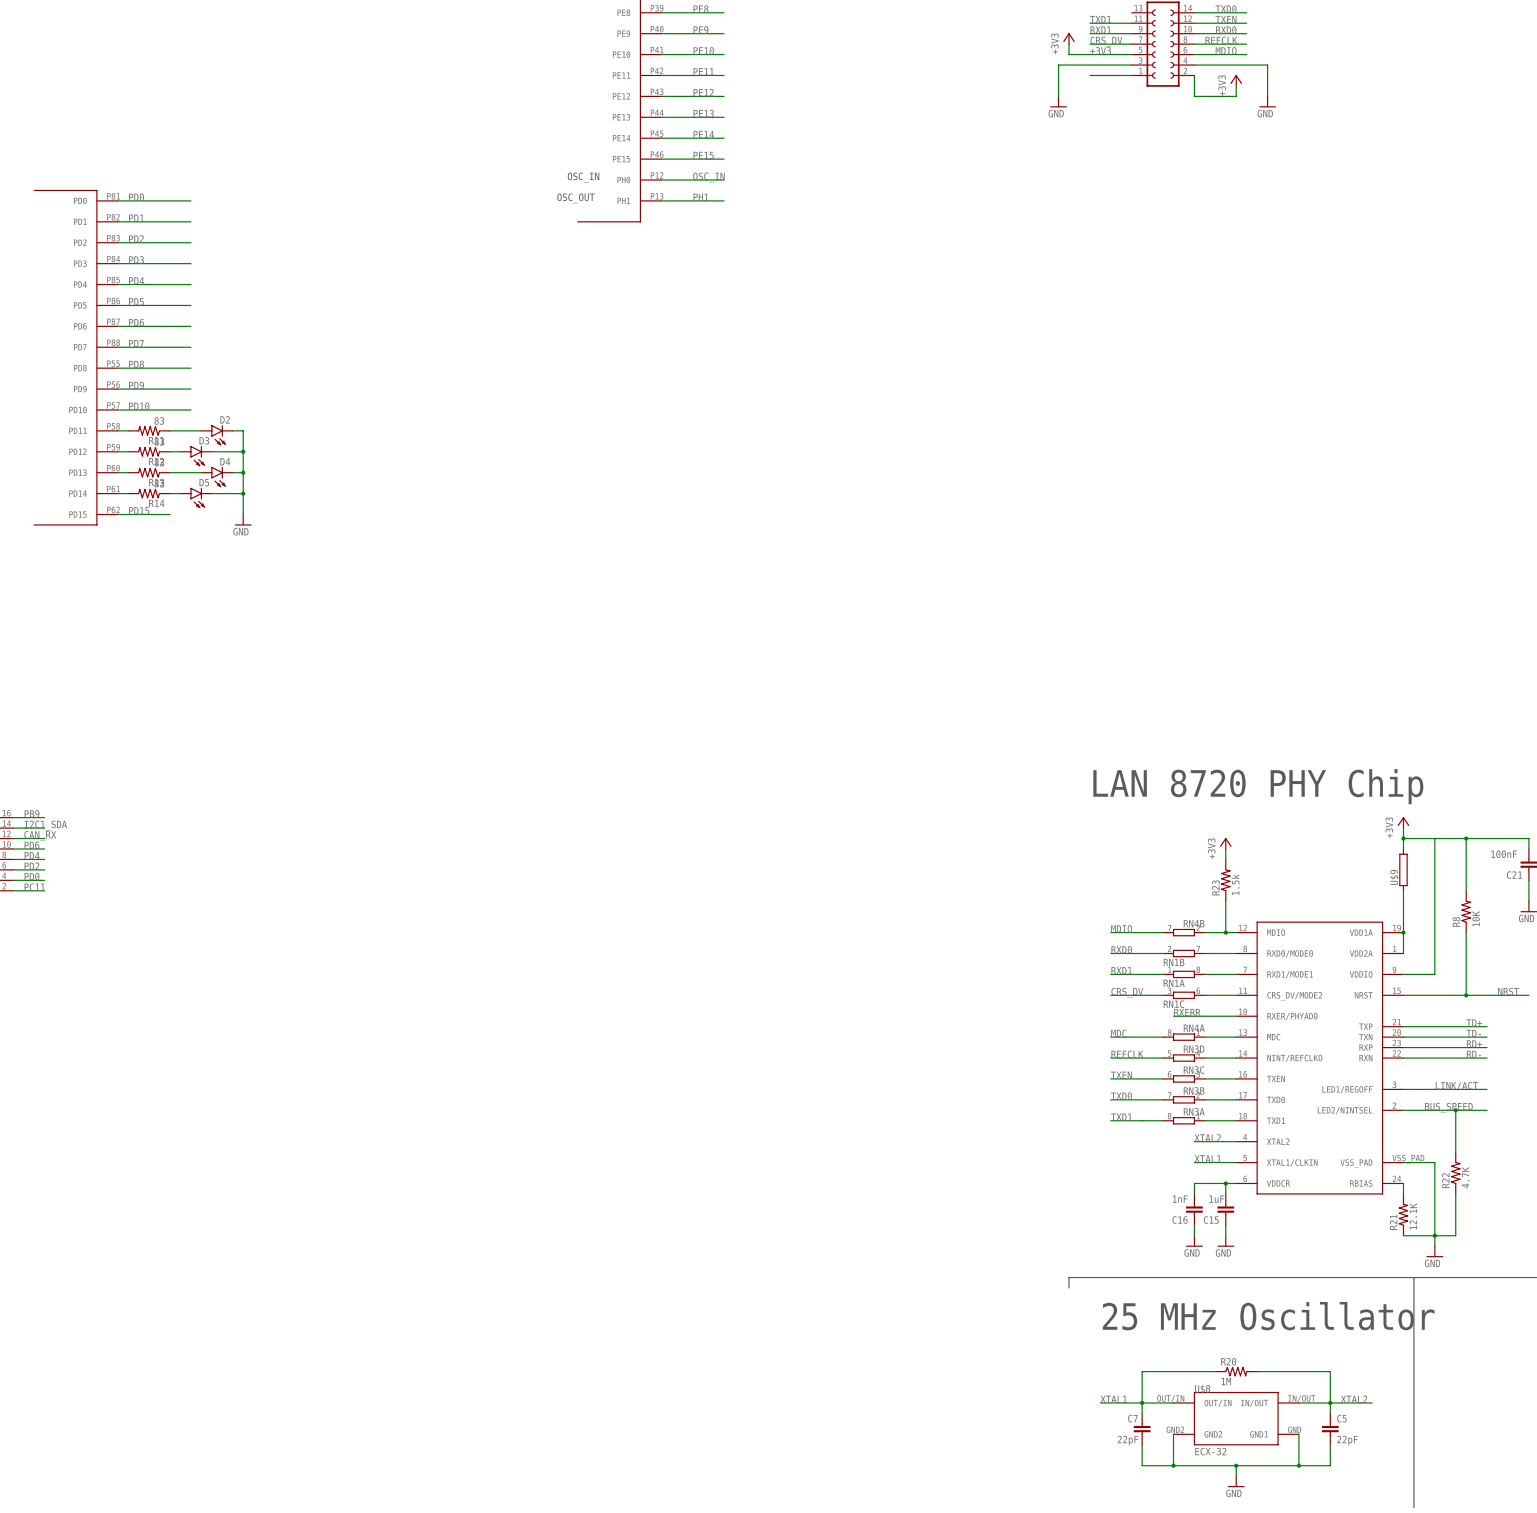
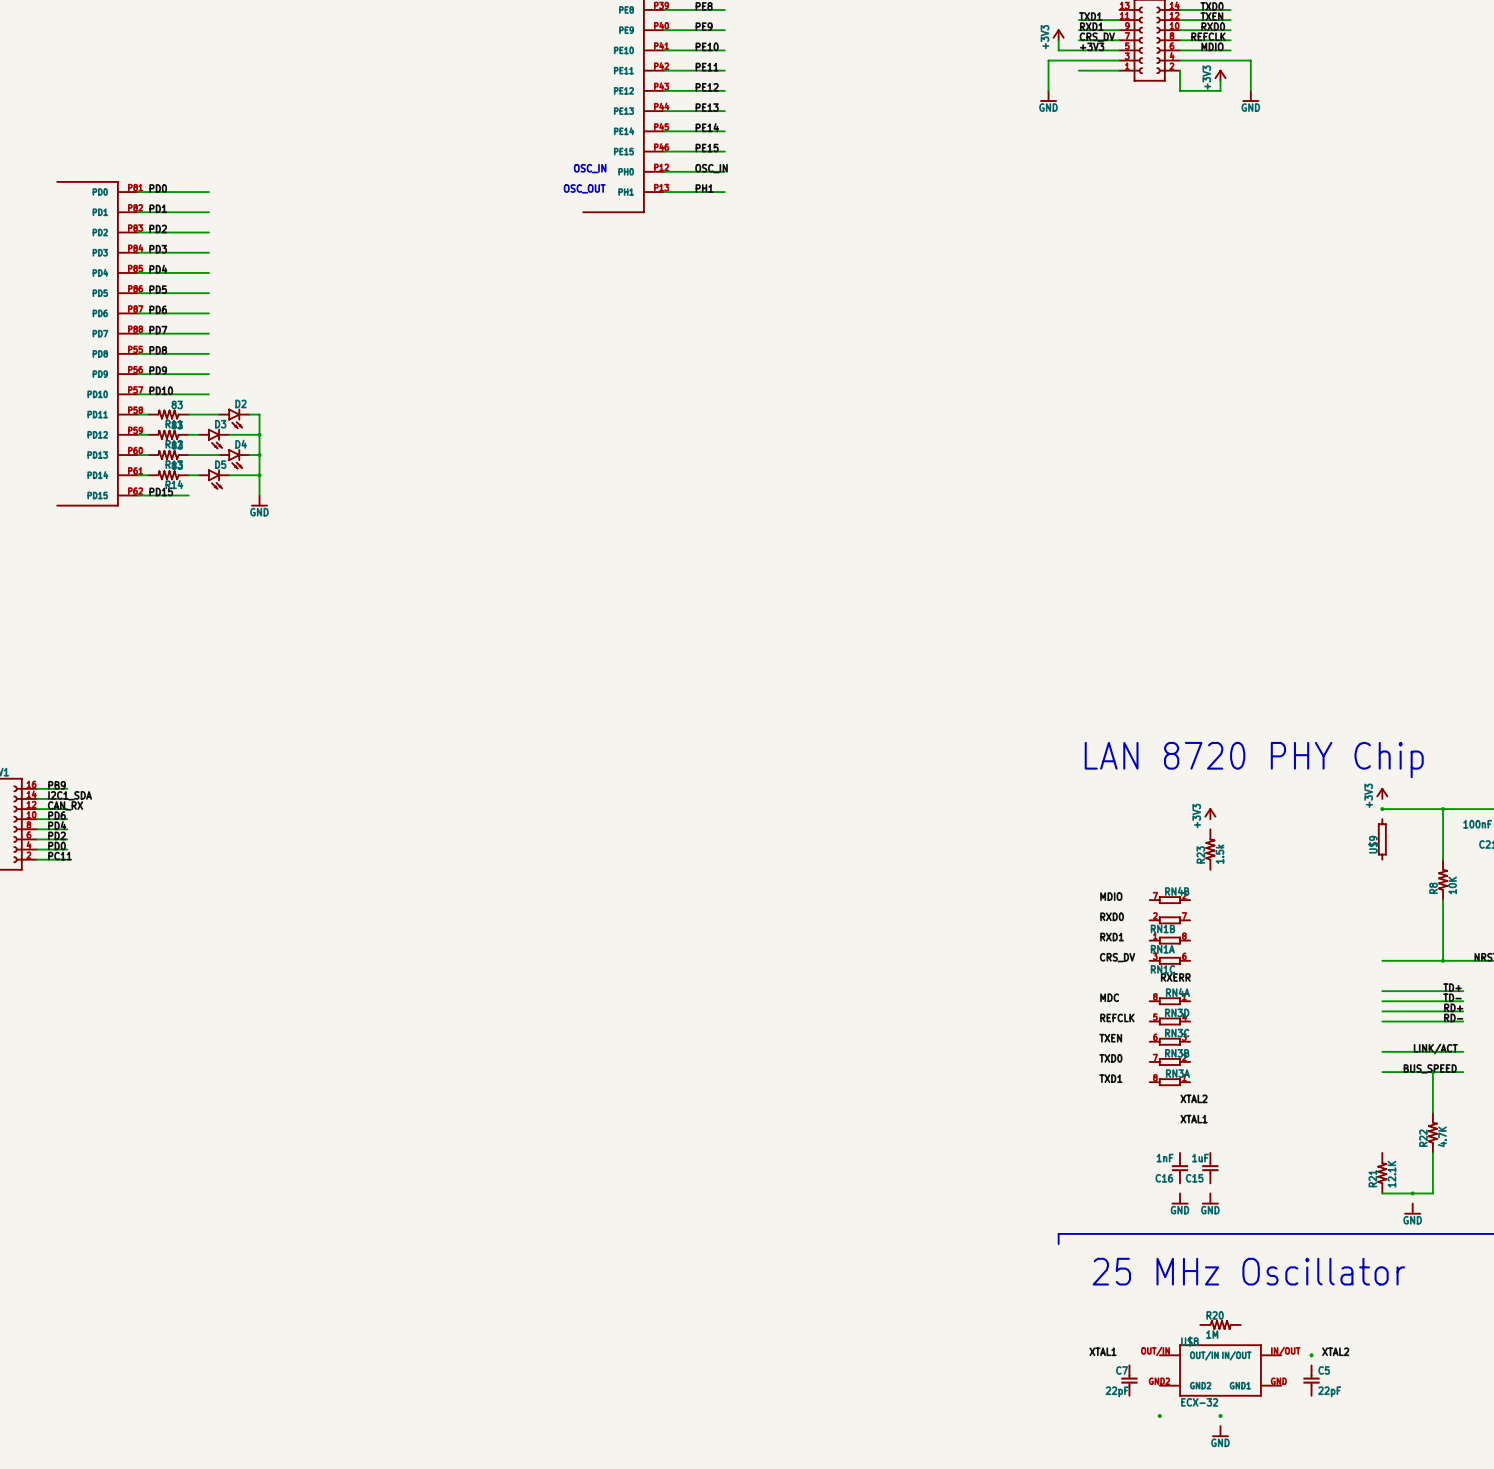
wire: (1403, 828) (1403, 848) -> none
wire: (1434, 838) (1434, 974) (1403, 974) -> none
wire: (1225, 848) (1225, 859) -> none
wire: (1403, 890) (1403, 953) -> none
wire: (1225, 901) (1225, 932) -> none
wire: (1110, 932) (1163, 932) -> none
wire: (1204, 932) (1236, 932) -> none
junction: (1225, 932) -> none
junction: (1403, 932) -> none
wire: (1110, 953) (1163, 953) -> none
wire: (1204, 953) (1236, 953) -> none
wire: (1110, 974) (1163, 974) -> none
wire: (1204, 974) (1236, 974) -> none
wire: (1110, 995) (1163, 995) -> none
wire: (1204, 995) (1236, 995) -> none
wire: (1173, 1016) (1236, 1016) -> none
wire: (1110, 1037) (1163, 1037) -> none
wire: (1204, 1037) (1236, 1037) -> none
wire: (1110, 1058) (1163, 1058) -> none
wire: (1204, 1058) (1236, 1058) -> none
part: (1319, 1058) -> none
wire: (1110, 1078) (1163, 1078) -> none
wire: (1204, 1078) (1236, 1078) -> none
wire: (1110, 1099) (1163, 1099) -> none
wire: (1204, 1099) (1236, 1099) -> none
wire: (1110, 1120) (1163, 1120) -> none
wire: (1204, 1120) (1236, 1120) -> none
wire: (1194, 1141) (1236, 1141) -> none
wire: (1194, 1162) (1236, 1162) -> none
wire: (1403, 1162) (1434, 1162) (1434, 1246) -> none
wire: (1225, 1183) (1225, 1193) -> none
junction: (1225, 1183) -> none
wire: (1236, 1183) (1194, 1183) (1194, 1193) -> none
wire: (1403, 1183) (1403, 1193) -> none
wire: (1194, 1225) (1194, 1235) -> none
wire: (1225, 1225) (1225, 1235) -> none
line: (1413, 1277) (1413, 1507) -> none
wire: (1215, 1371) (1142, 1371) (1142, 1413) -> none
wire: (1257, 1371) (1330, 1371) (1330, 1413) -> none
wire: (1100, 1402) (1173, 1402) -> none
junction: (1142, 1402) -> none
wire: (1298, 1402) (1372, 1402) -> none
wire: (1173, 1434) (1173, 1465) -> none
wire: (1298, 1434) (1298, 1465) -> none
wire: (1142, 1444) (1142, 1465) (1330, 1465) (1330, 1444) -> none
wire: (1236, 1465) (1236, 1476) -> none
junction: (1298, 1465) -> none

